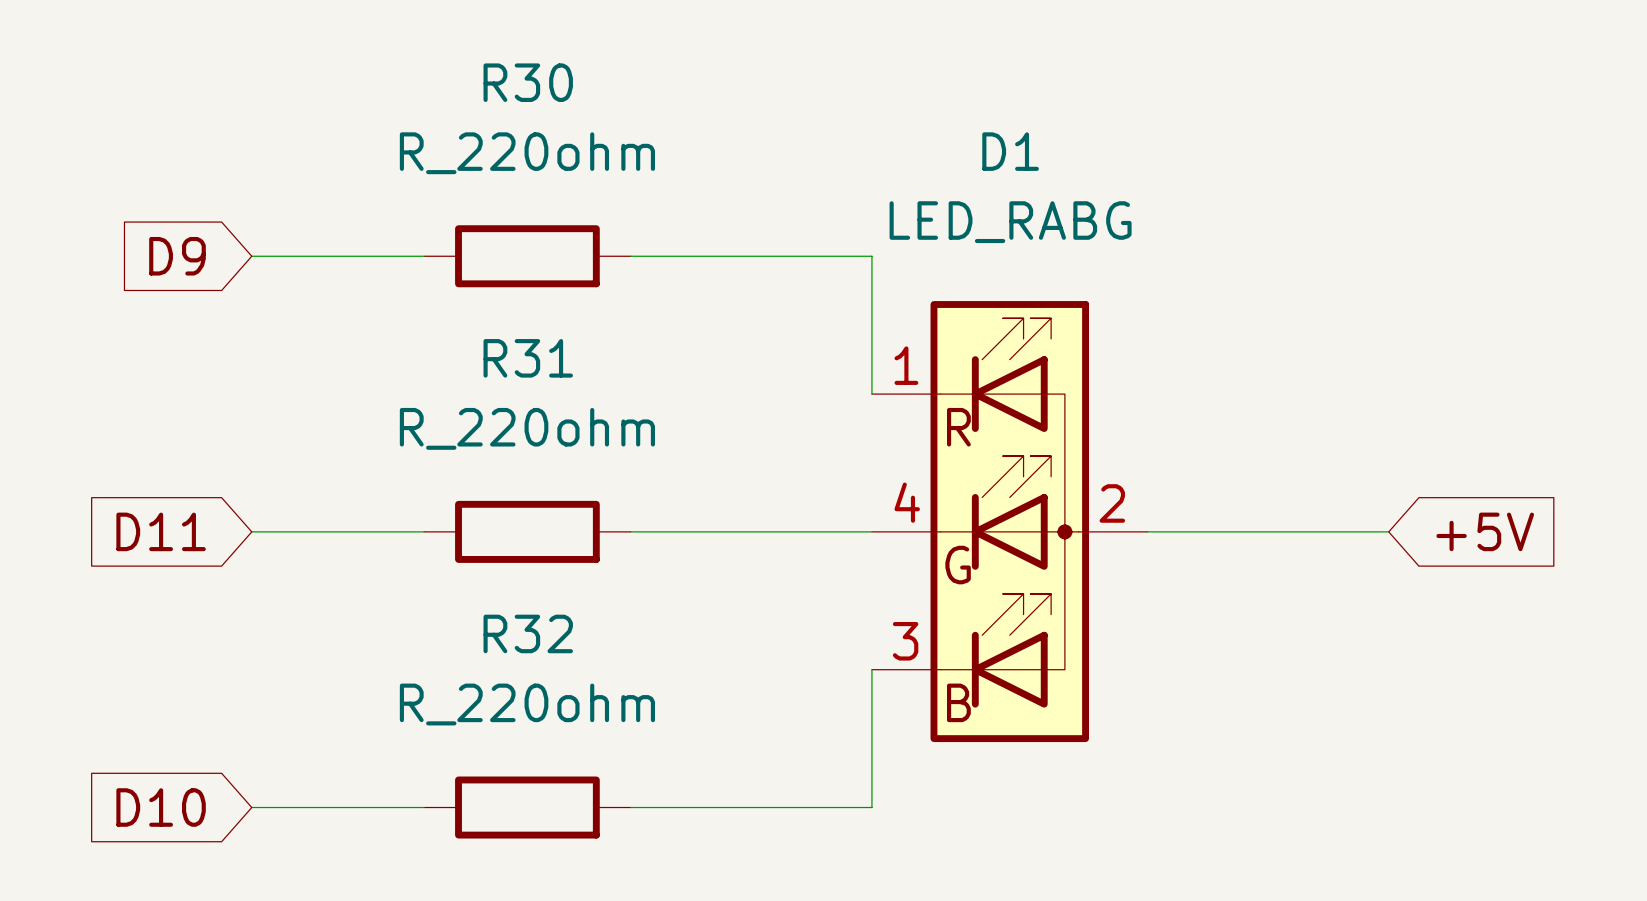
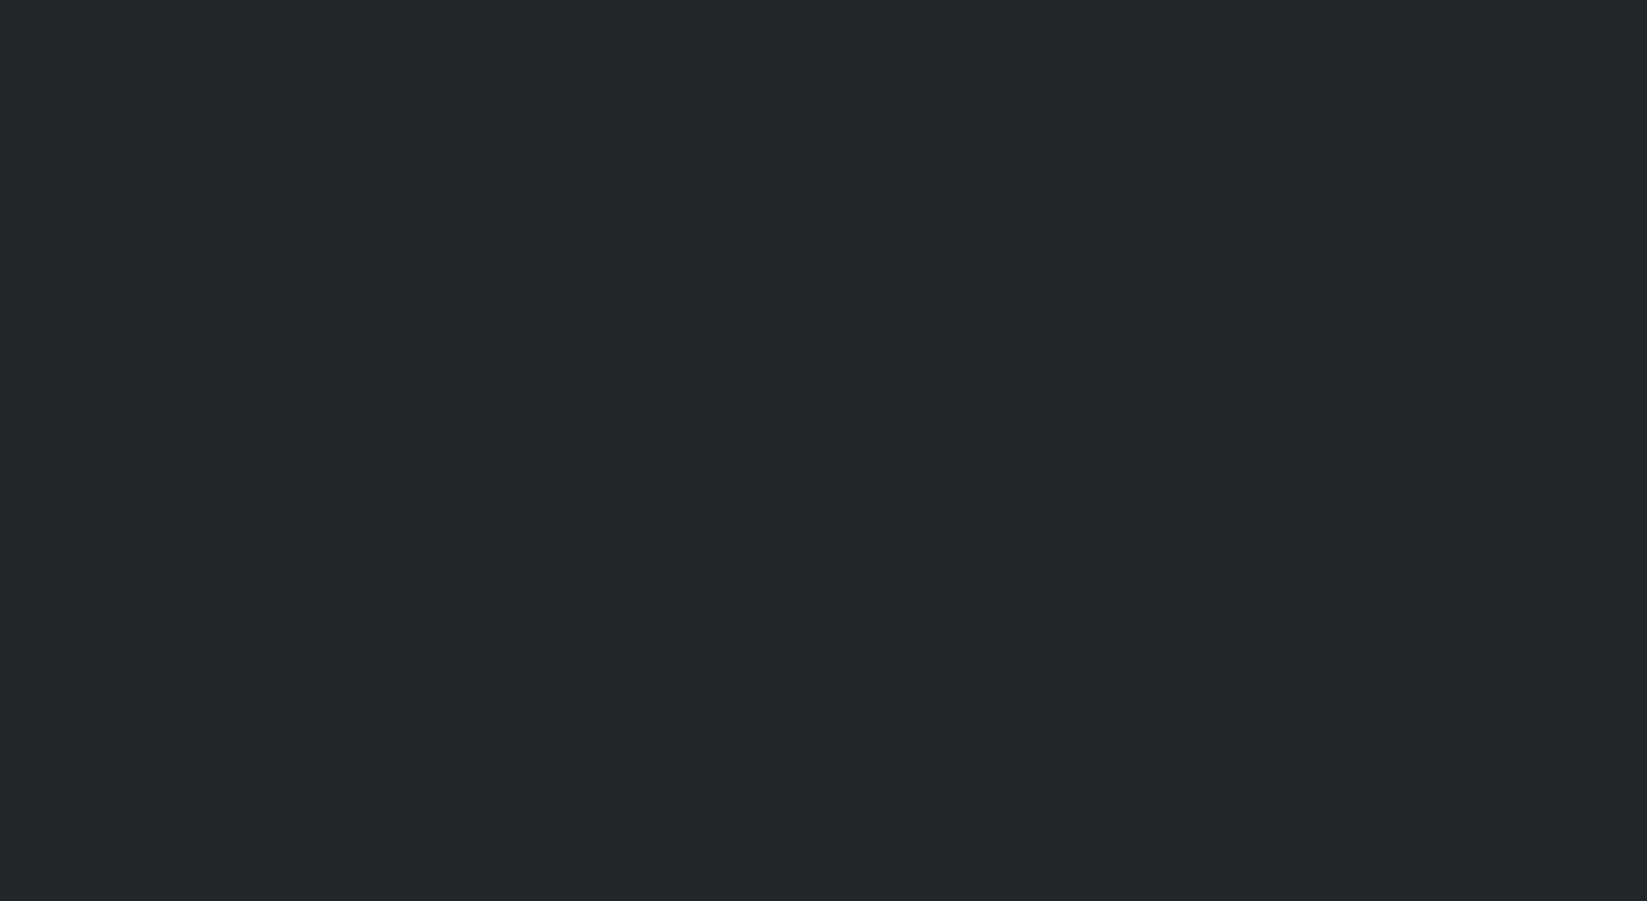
global label: D9 (177, 256) -> none
wire: (251, 256) (424, 256) -> none
R30: R_220ohm (527, 256) -> none
wire: (630, 256) (871, 256) (871, 394) -> none
D1: LED_RABG (1009, 521) -> none
global label: D11 (161, 531) -> none
wire: (251, 531) (424, 531) -> none
R31: R_220ohm (527, 531) -> none
wire: (630, 531) (871, 531) -> none
wire: (1147, 531) (1388, 531) -> none
global label: +5V (1485, 531) -> none
wire: (871, 669) (871, 807) (630, 807) -> none
global label: D10 (161, 807) -> none
wire: (251, 807) (424, 807) -> none
R32: R_220ohm (527, 807) -> none

